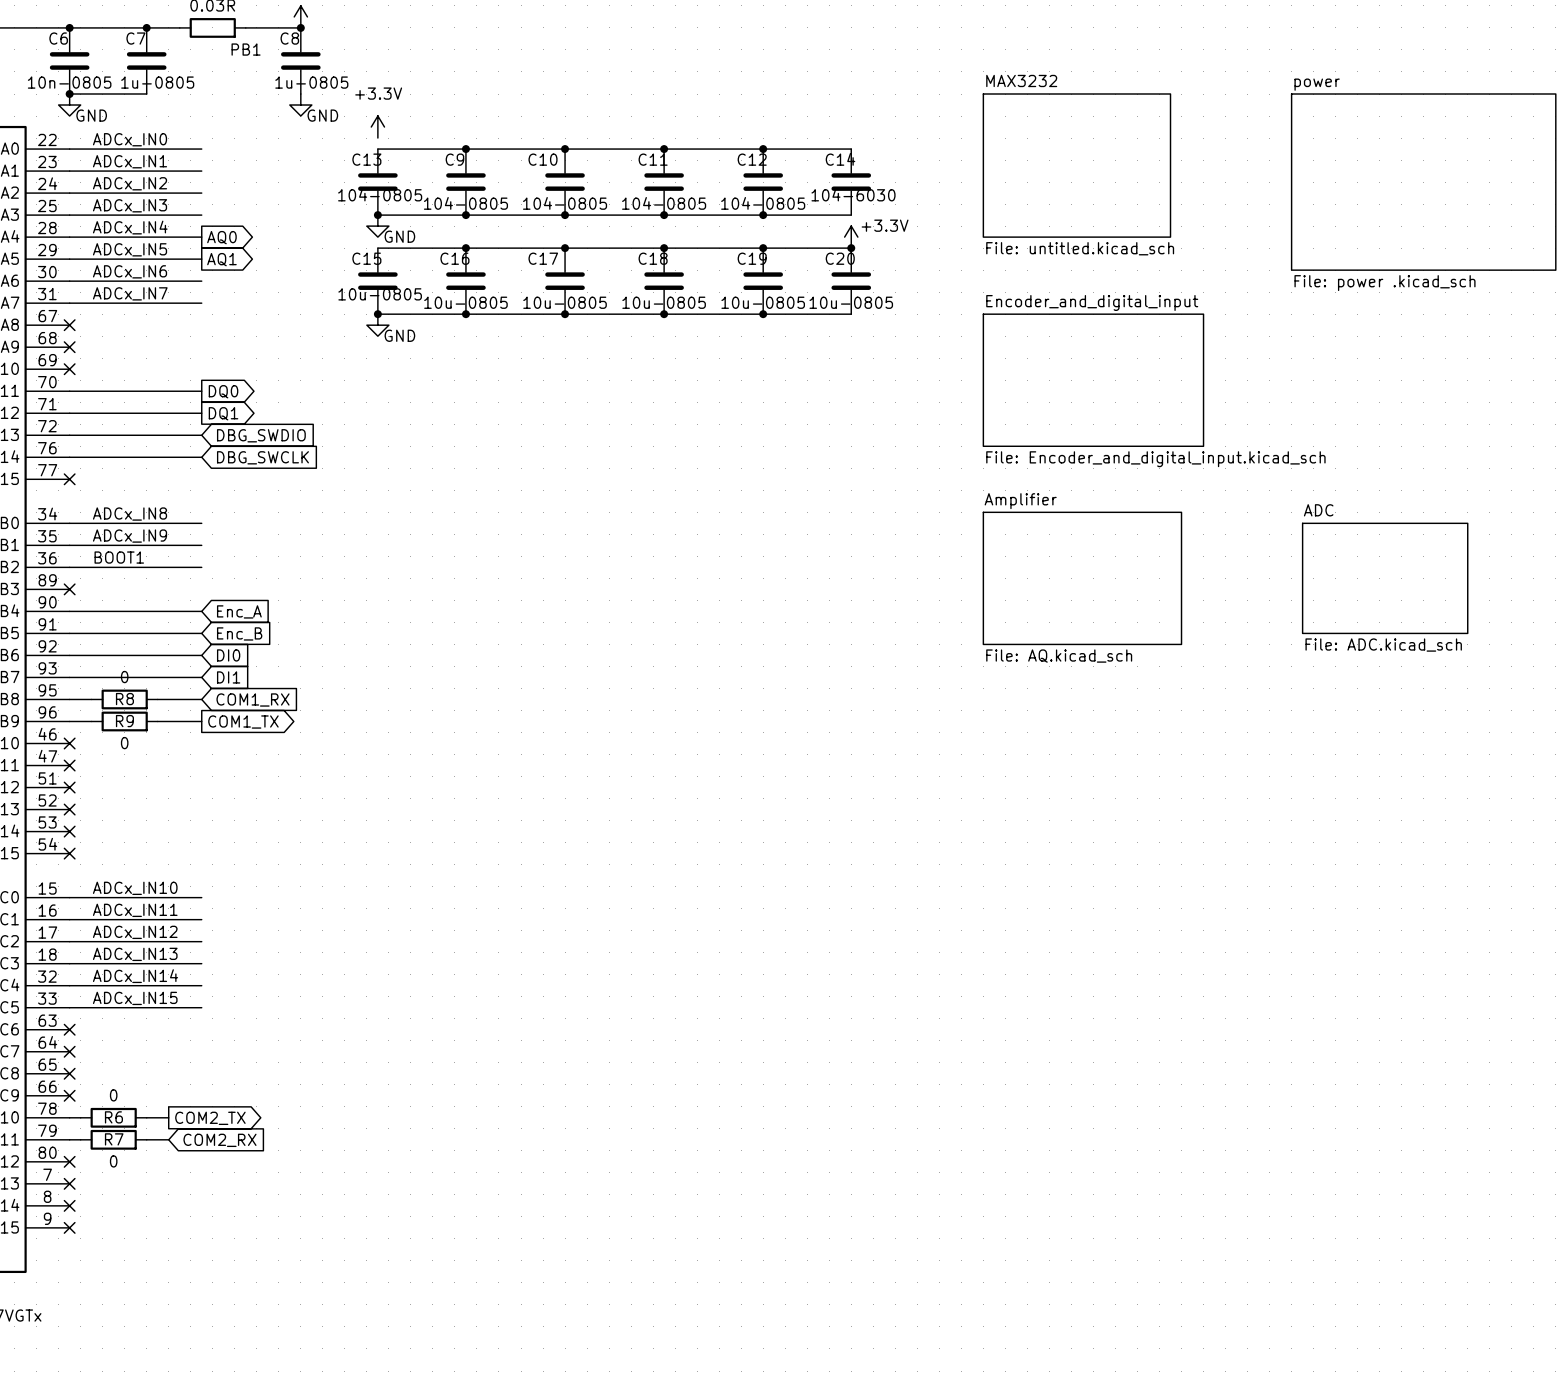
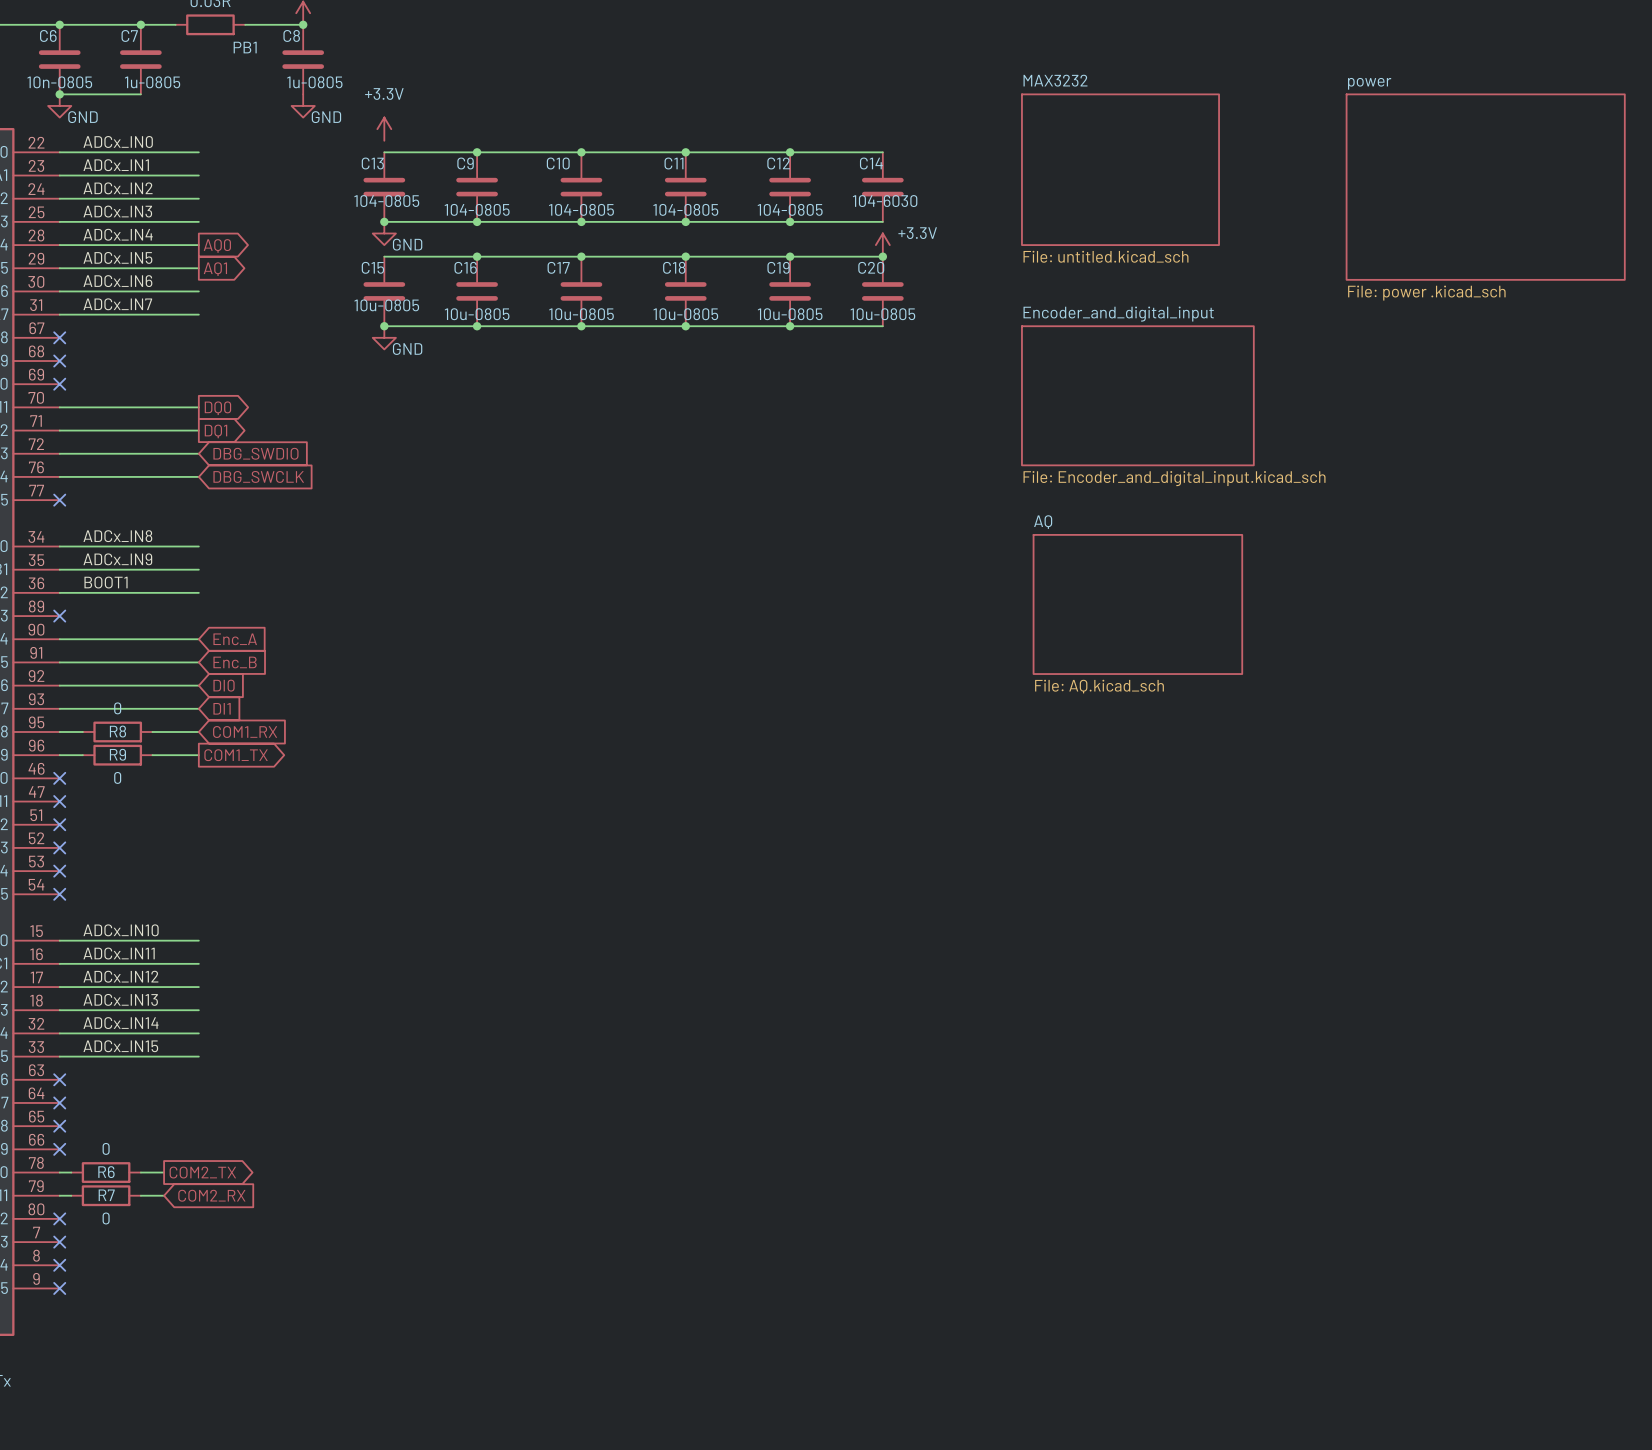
sheet Amplifier: File: AQ.kicad_sch (1082, 578) -> none
sheet AQ: none -> File: AQ.kicad_sch (1137, 604)
sheet ADC: File: ADC.kicad_sch (1385, 578) -> none

